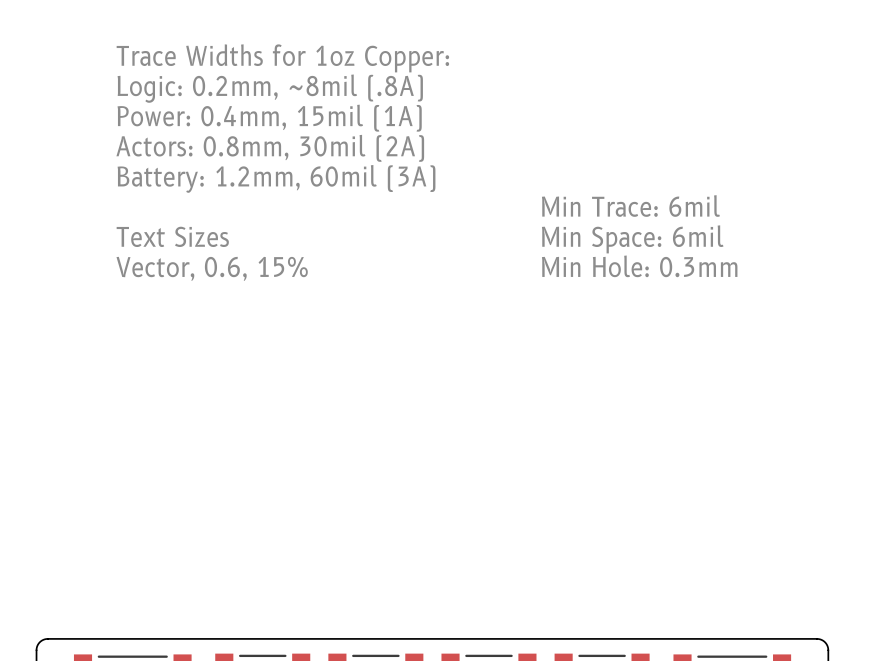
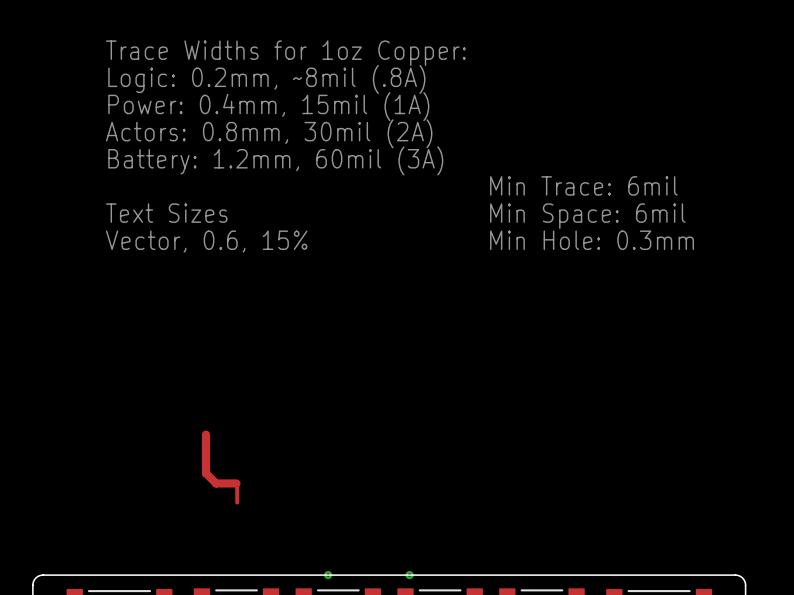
top track: none -> (205, 434) (205, 473) (216, 483) (236, 483) (237, 502)
via: none -> (328, 575)
via: none -> (409, 575)

